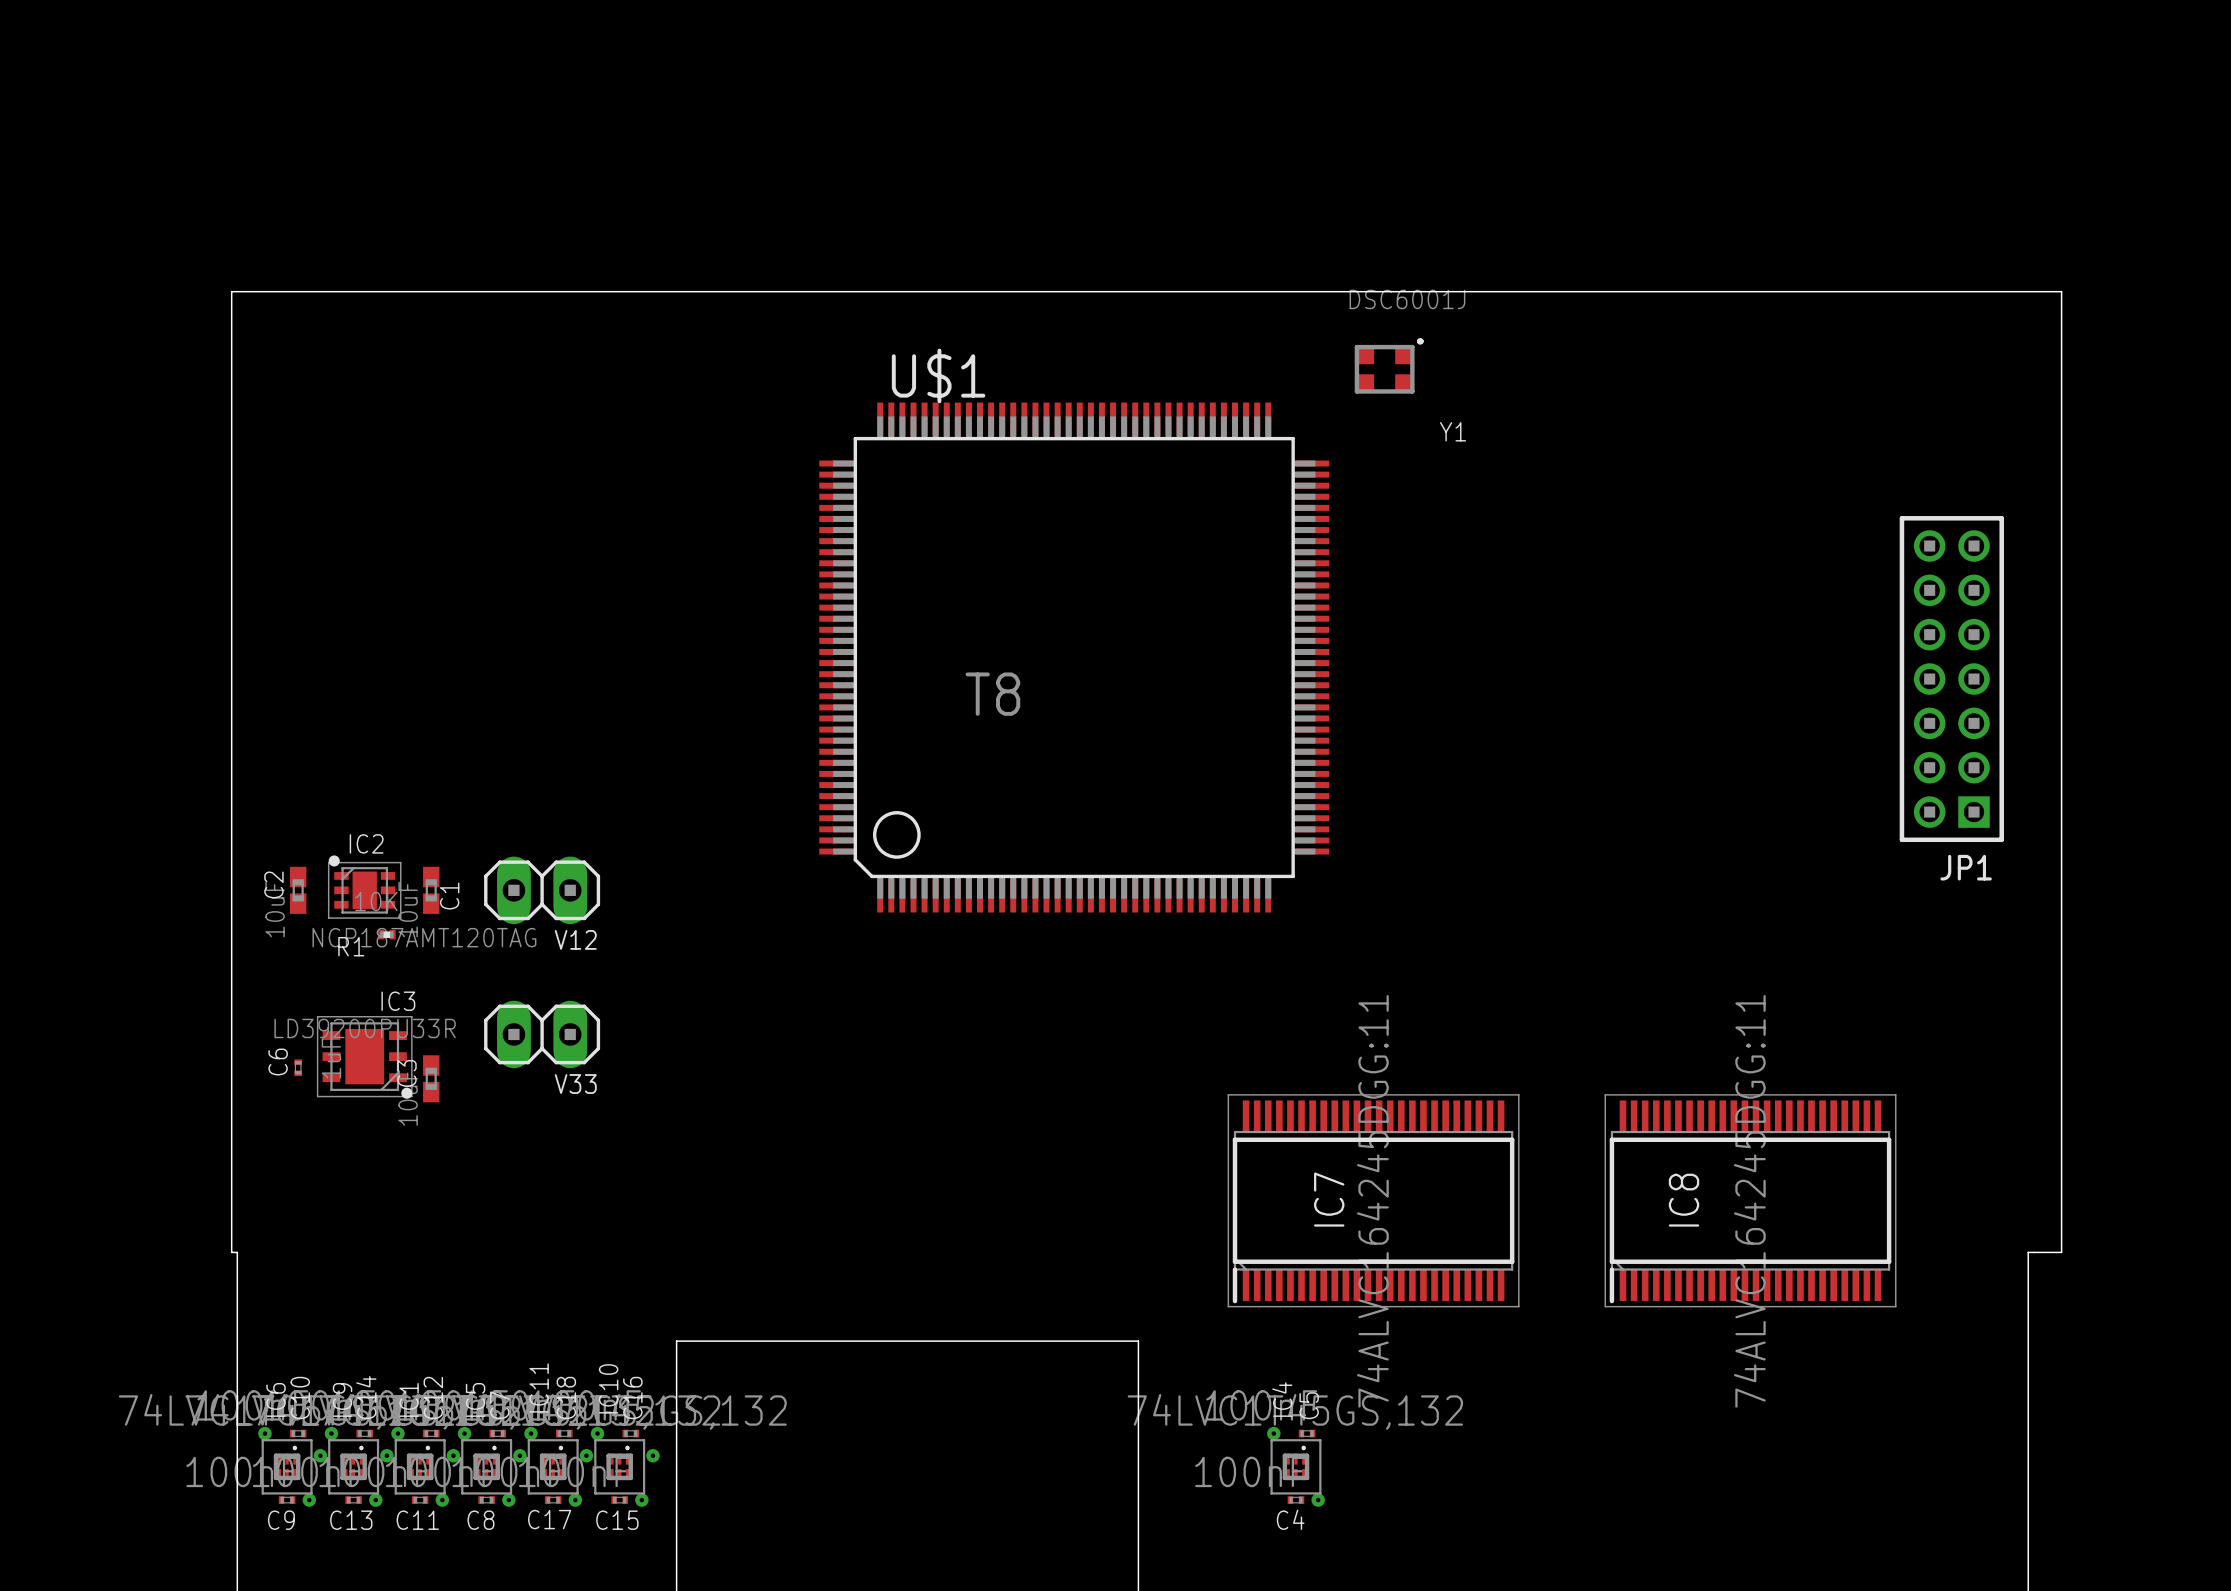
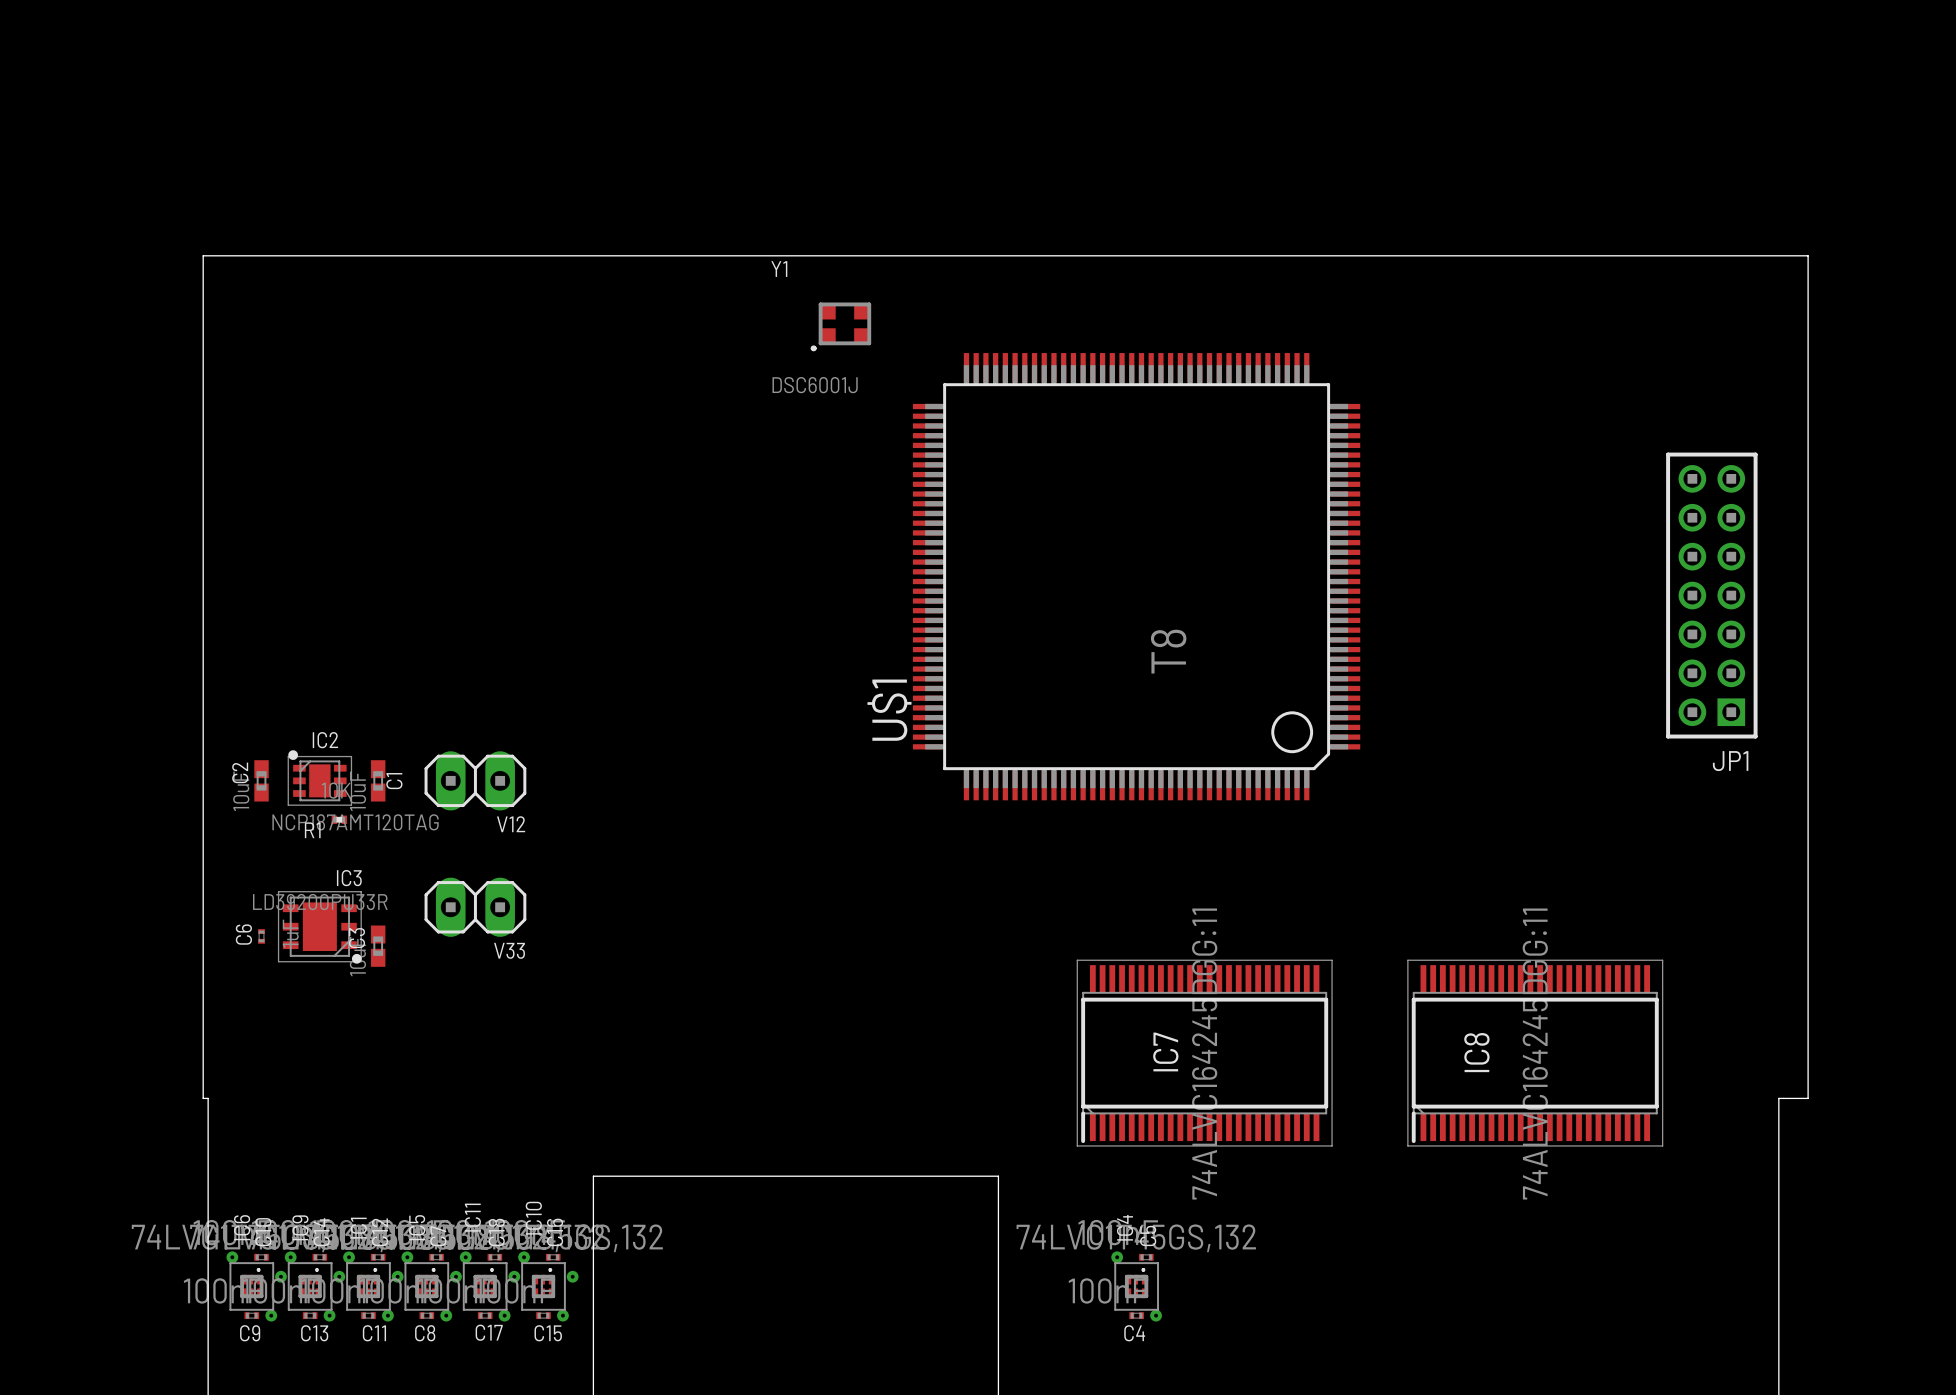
Y1 rotation: 0° (1389, 365) -> 180° (840, 326)
Y1 position: (1389, 365) -> (840, 326)
U$1 rotation: 0° (1074, 657) -> 90° counterclockwise (1136, 576)

